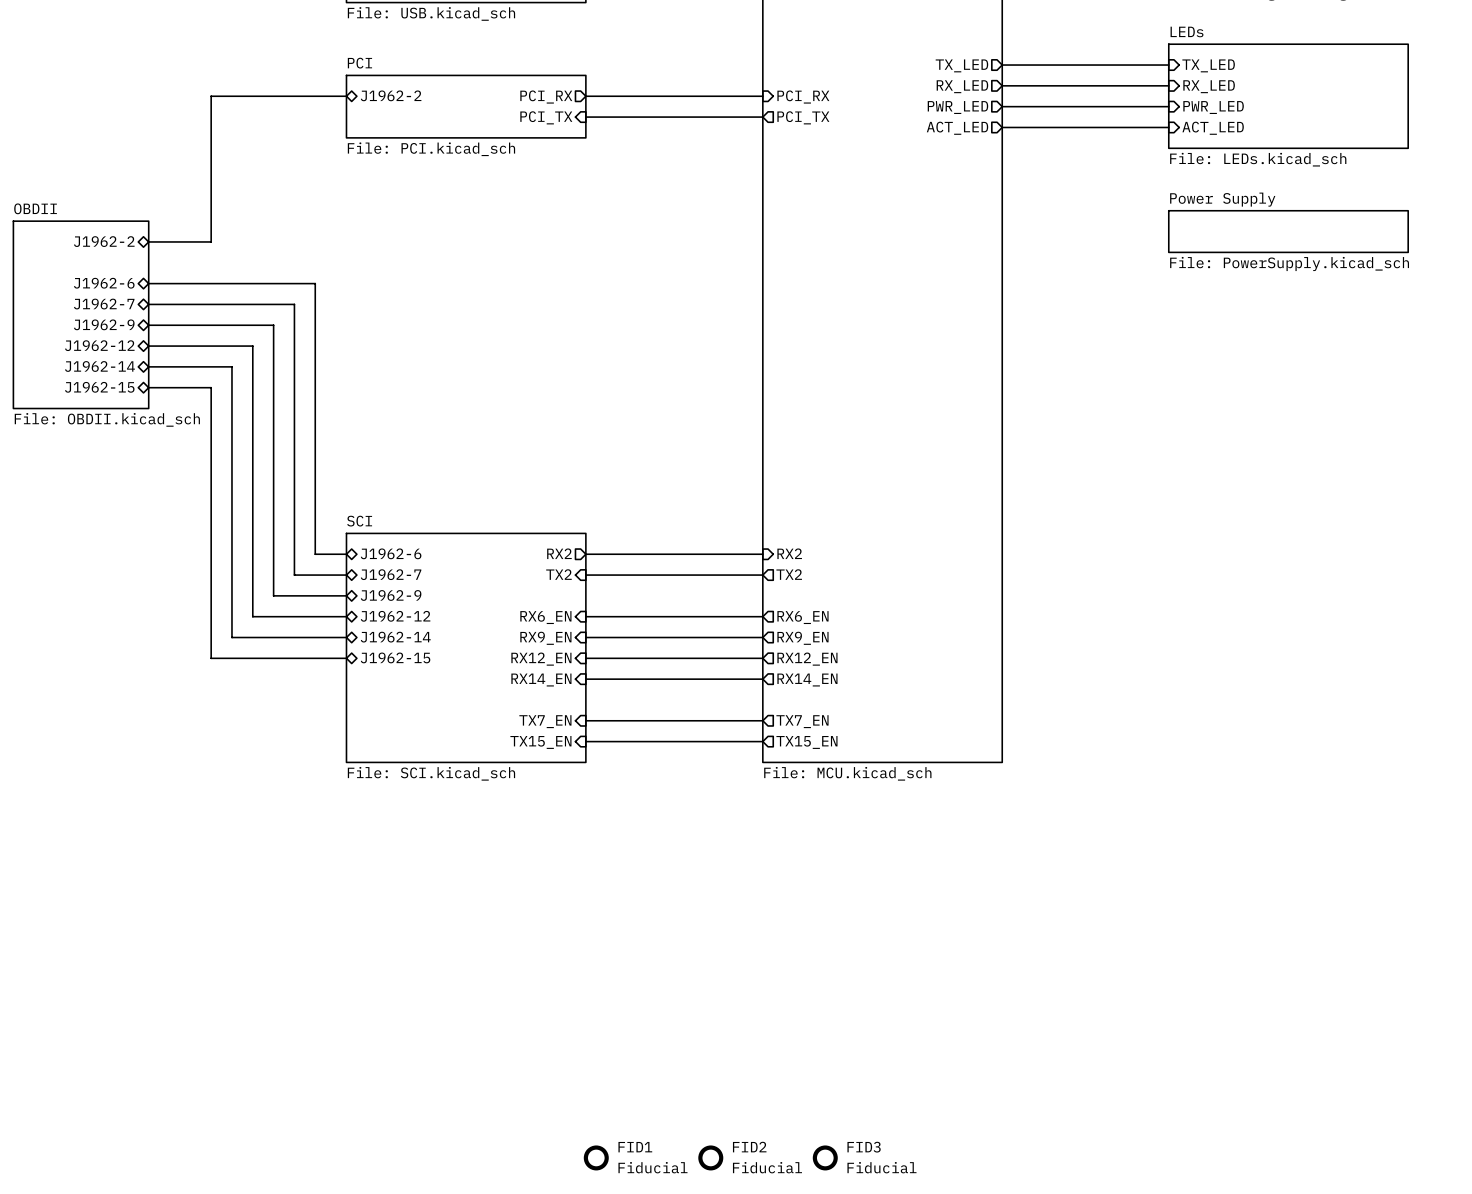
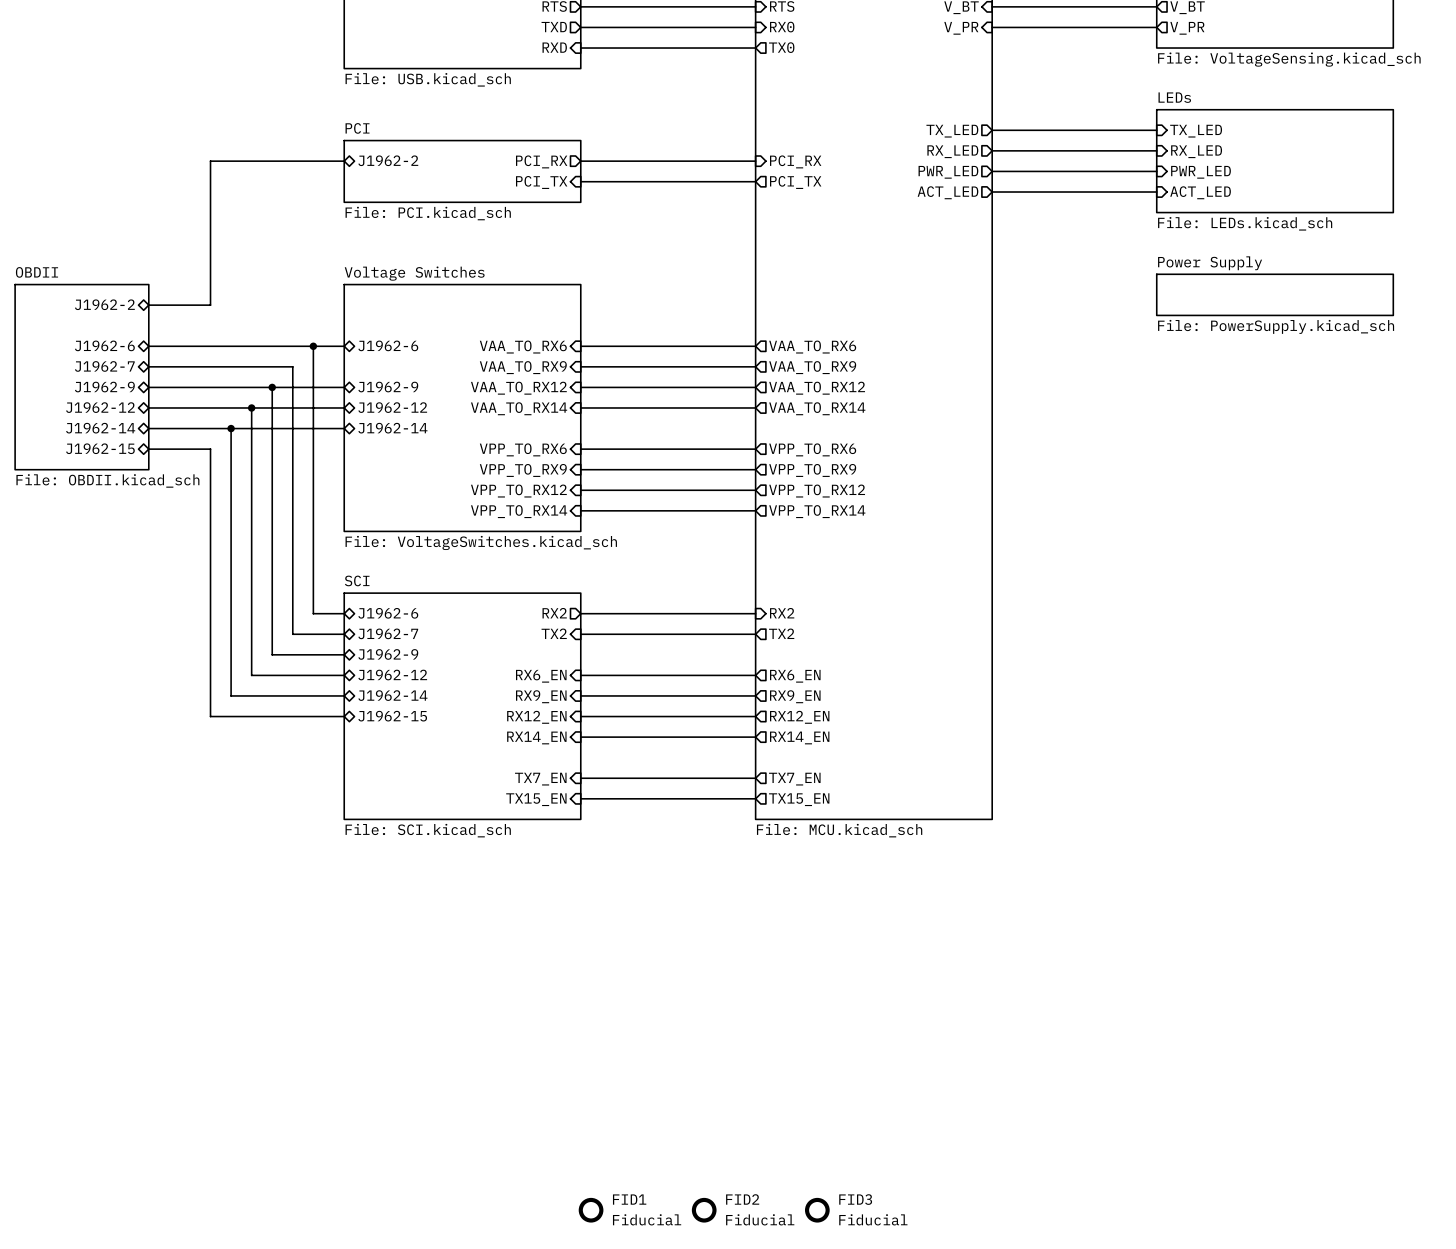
wire: none -> (313, 346) (344, 346)
junction: none -> (313, 346)
sheet pin: none -> J1962-6 (388, 345)
wire: none -> (580, 346) (755, 346)
sheet pin: none -> VAA_TO_RX6 (523, 347)
sheet pin: none -> VAA_TO_RX6 (812, 347)
wire: none -> (580, 366) (755, 366)
sheet pin: none -> VAA_TO_RX9 (523, 367)
sheet pin: none -> VAA_TO_RX9 (812, 367)
sheet pin: none -> J1962-9 (388, 387)
wire: none -> (272, 387) (344, 387)
junction: none -> (272, 387)
wire: none -> (580, 387) (755, 387)
sheet pin: none -> VAA_TO_RX12 (518, 388)
sheet pin: none -> VAA_TO_RX12 (817, 388)
sheet pin: none -> J1962-12 (392, 407)
wire: none -> (251, 407) (344, 407)
junction: none -> (251, 407)
sheet Voltage Switches: none -> File: VoltageSwitches.kicad_sch (462, 407)
sheet pin: none -> VAA_TO_RX14 (519, 408)
wire: none -> (580, 407) (755, 407)
sheet pin: none -> VAA_TO_RX14 (817, 408)
wire: none -> (231, 428) (344, 428)
junction: none -> (231, 428)
sheet pin: none -> J1962-14 (392, 428)
wire: none -> (580, 449) (755, 449)
sheet pin: none -> VPP_TO_RX6 (523, 449)
sheet pin: none -> VPP_TO_RX6 (812, 449)
wire: none -> (580, 469) (755, 469)
sheet pin: none -> VPP_TO_RX9 (523, 470)
sheet pin: none -> VPP_TO_RX9 (812, 470)
wire: none -> (580, 490) (755, 490)
sheet pin: none -> VPP_TO_RX12 (518, 491)
sheet pin: none -> VPP_TO_RX12 (817, 491)
sheet pin: none -> VPP_TO_RX14 (519, 511)
wire: none -> (580, 510) (755, 510)
sheet pin: none -> VPP_TO_RX14 (817, 511)

